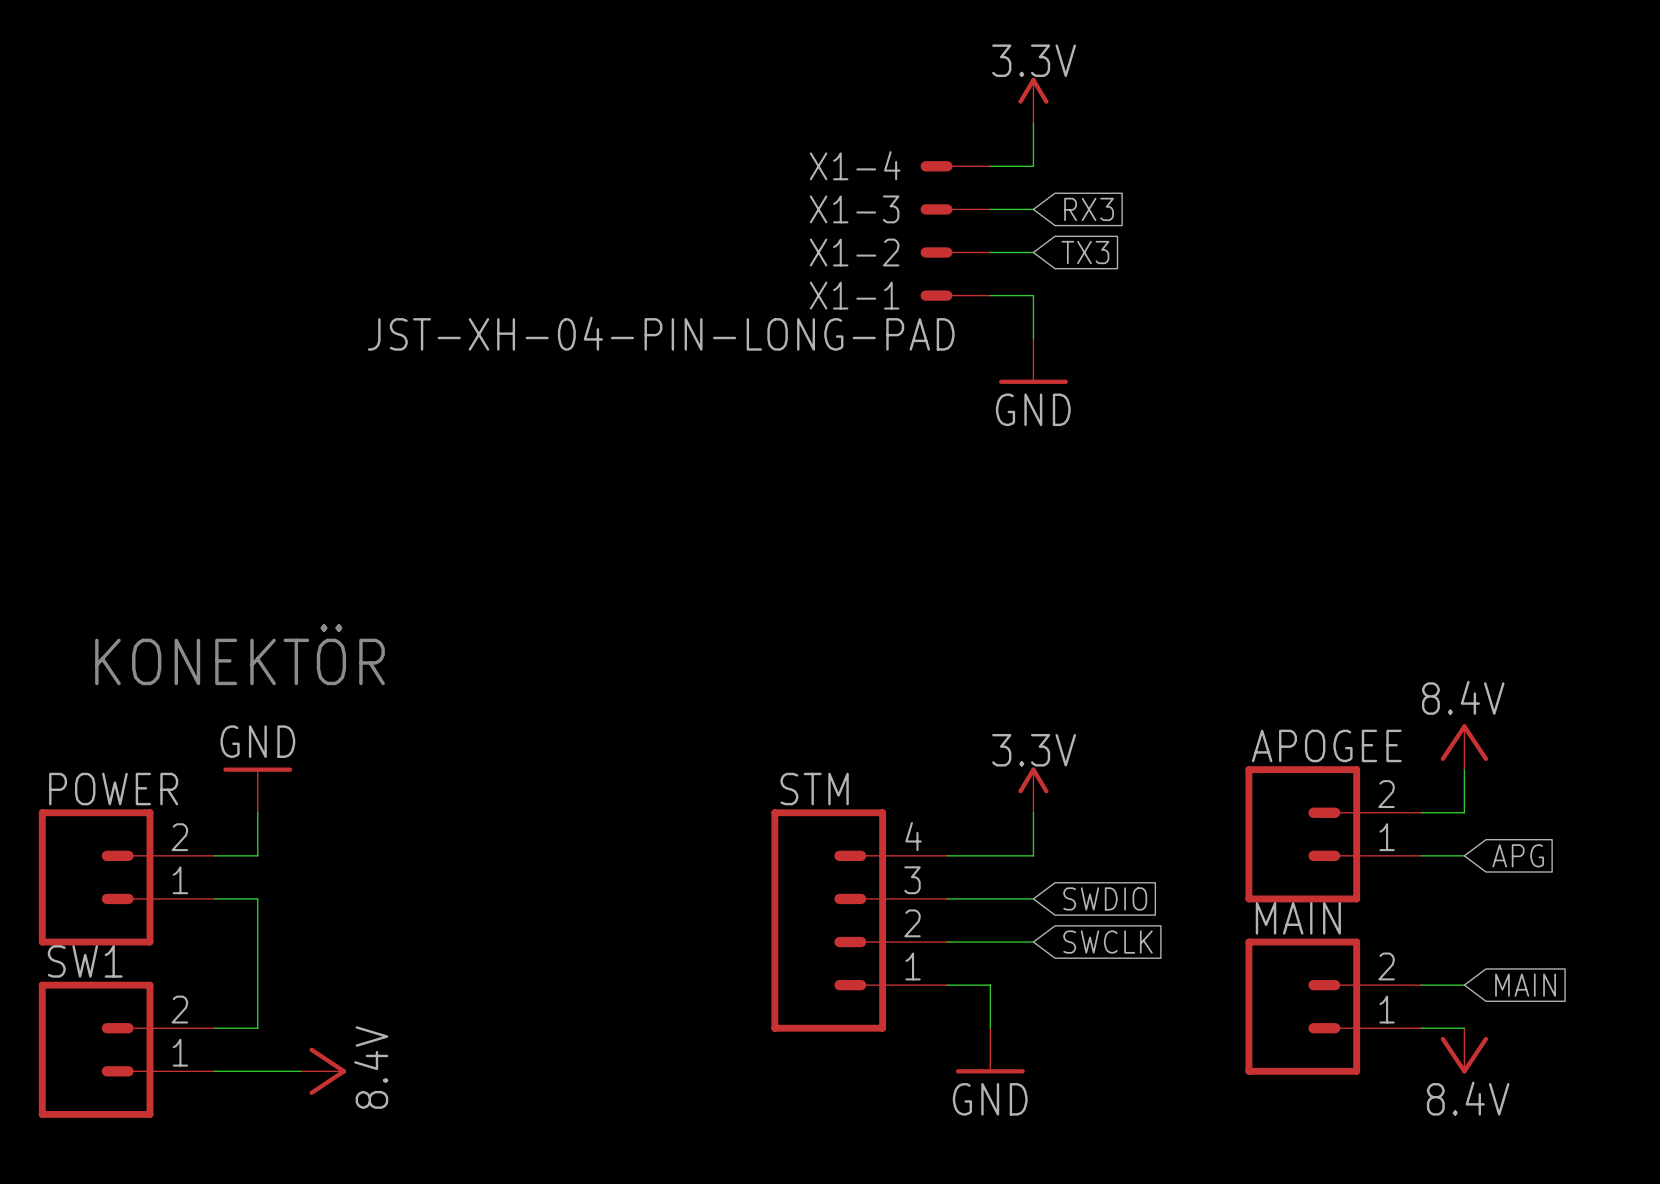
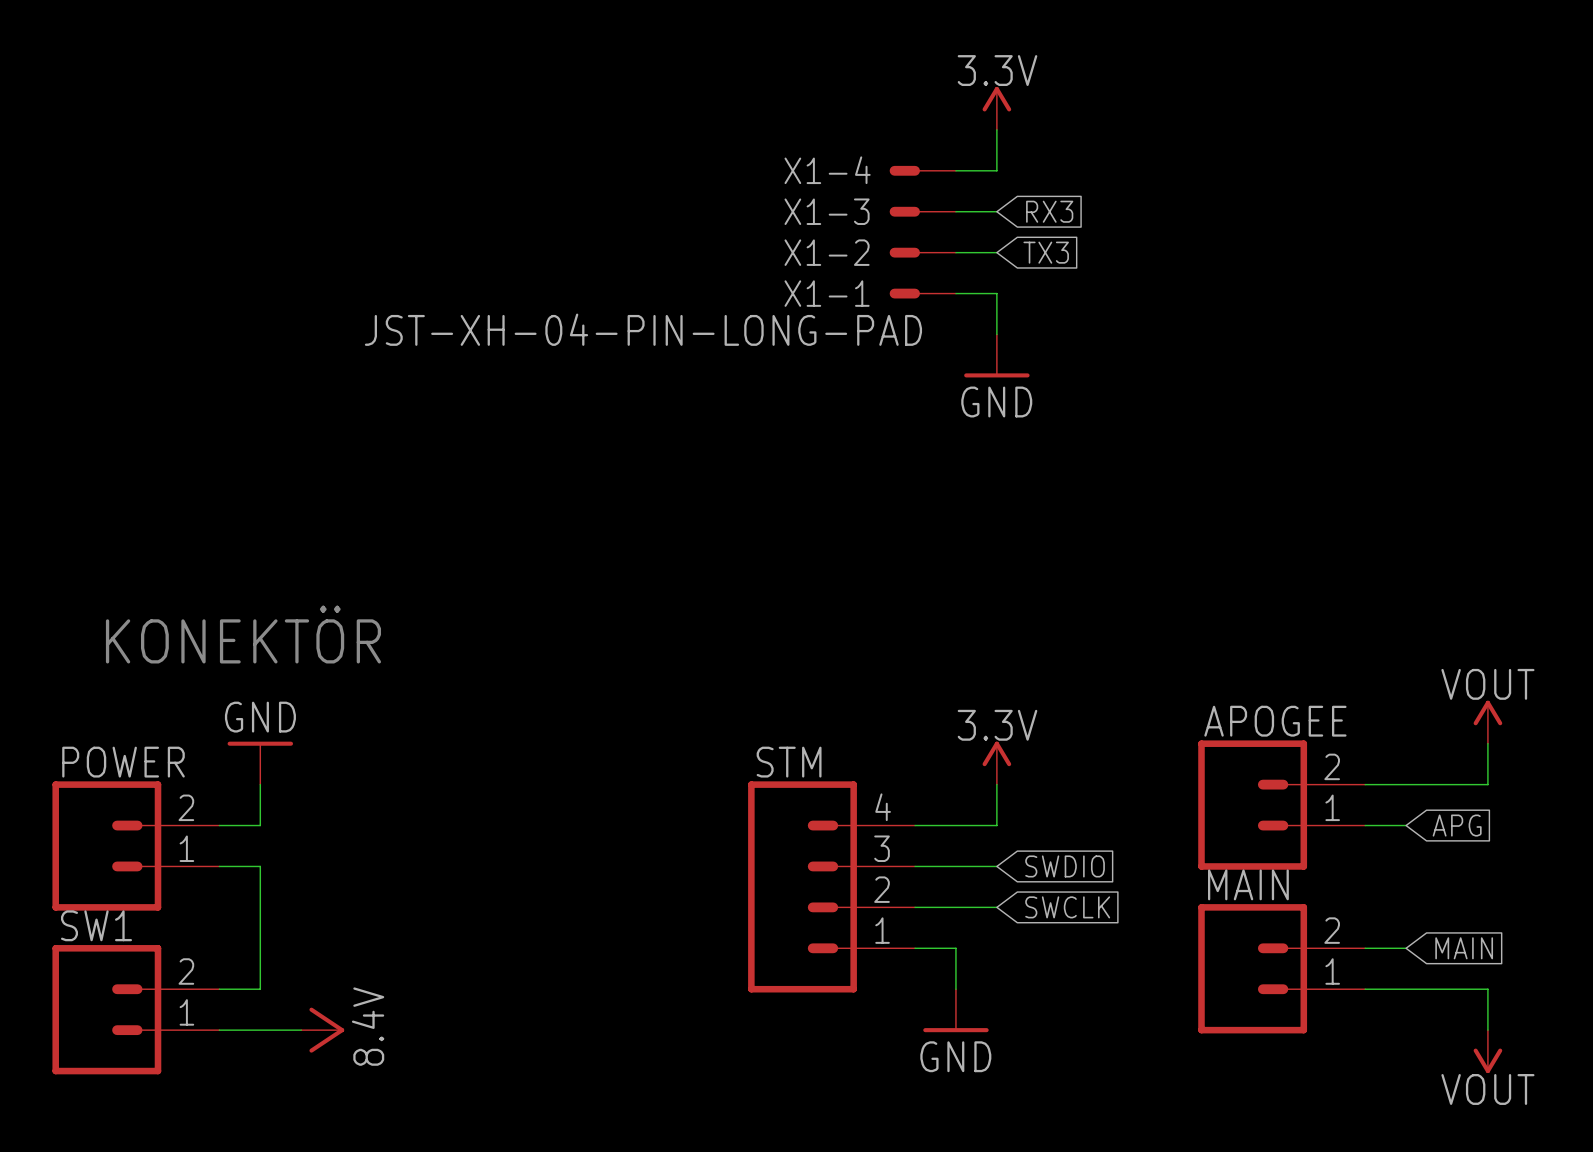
power symbol: 8.4V (1464, 747) -> none
power symbol: none -> VOUT (1487, 722)
wire: (1464, 769) (1464, 812) -> (1487, 743) (1487, 784) (1406, 784)
wire: none -> (1406, 989) (1487, 989) (1487, 1030)
power symbol: 8.4V (1464, 1050) -> none
power symbol: none -> VOUT (1487, 1051)

